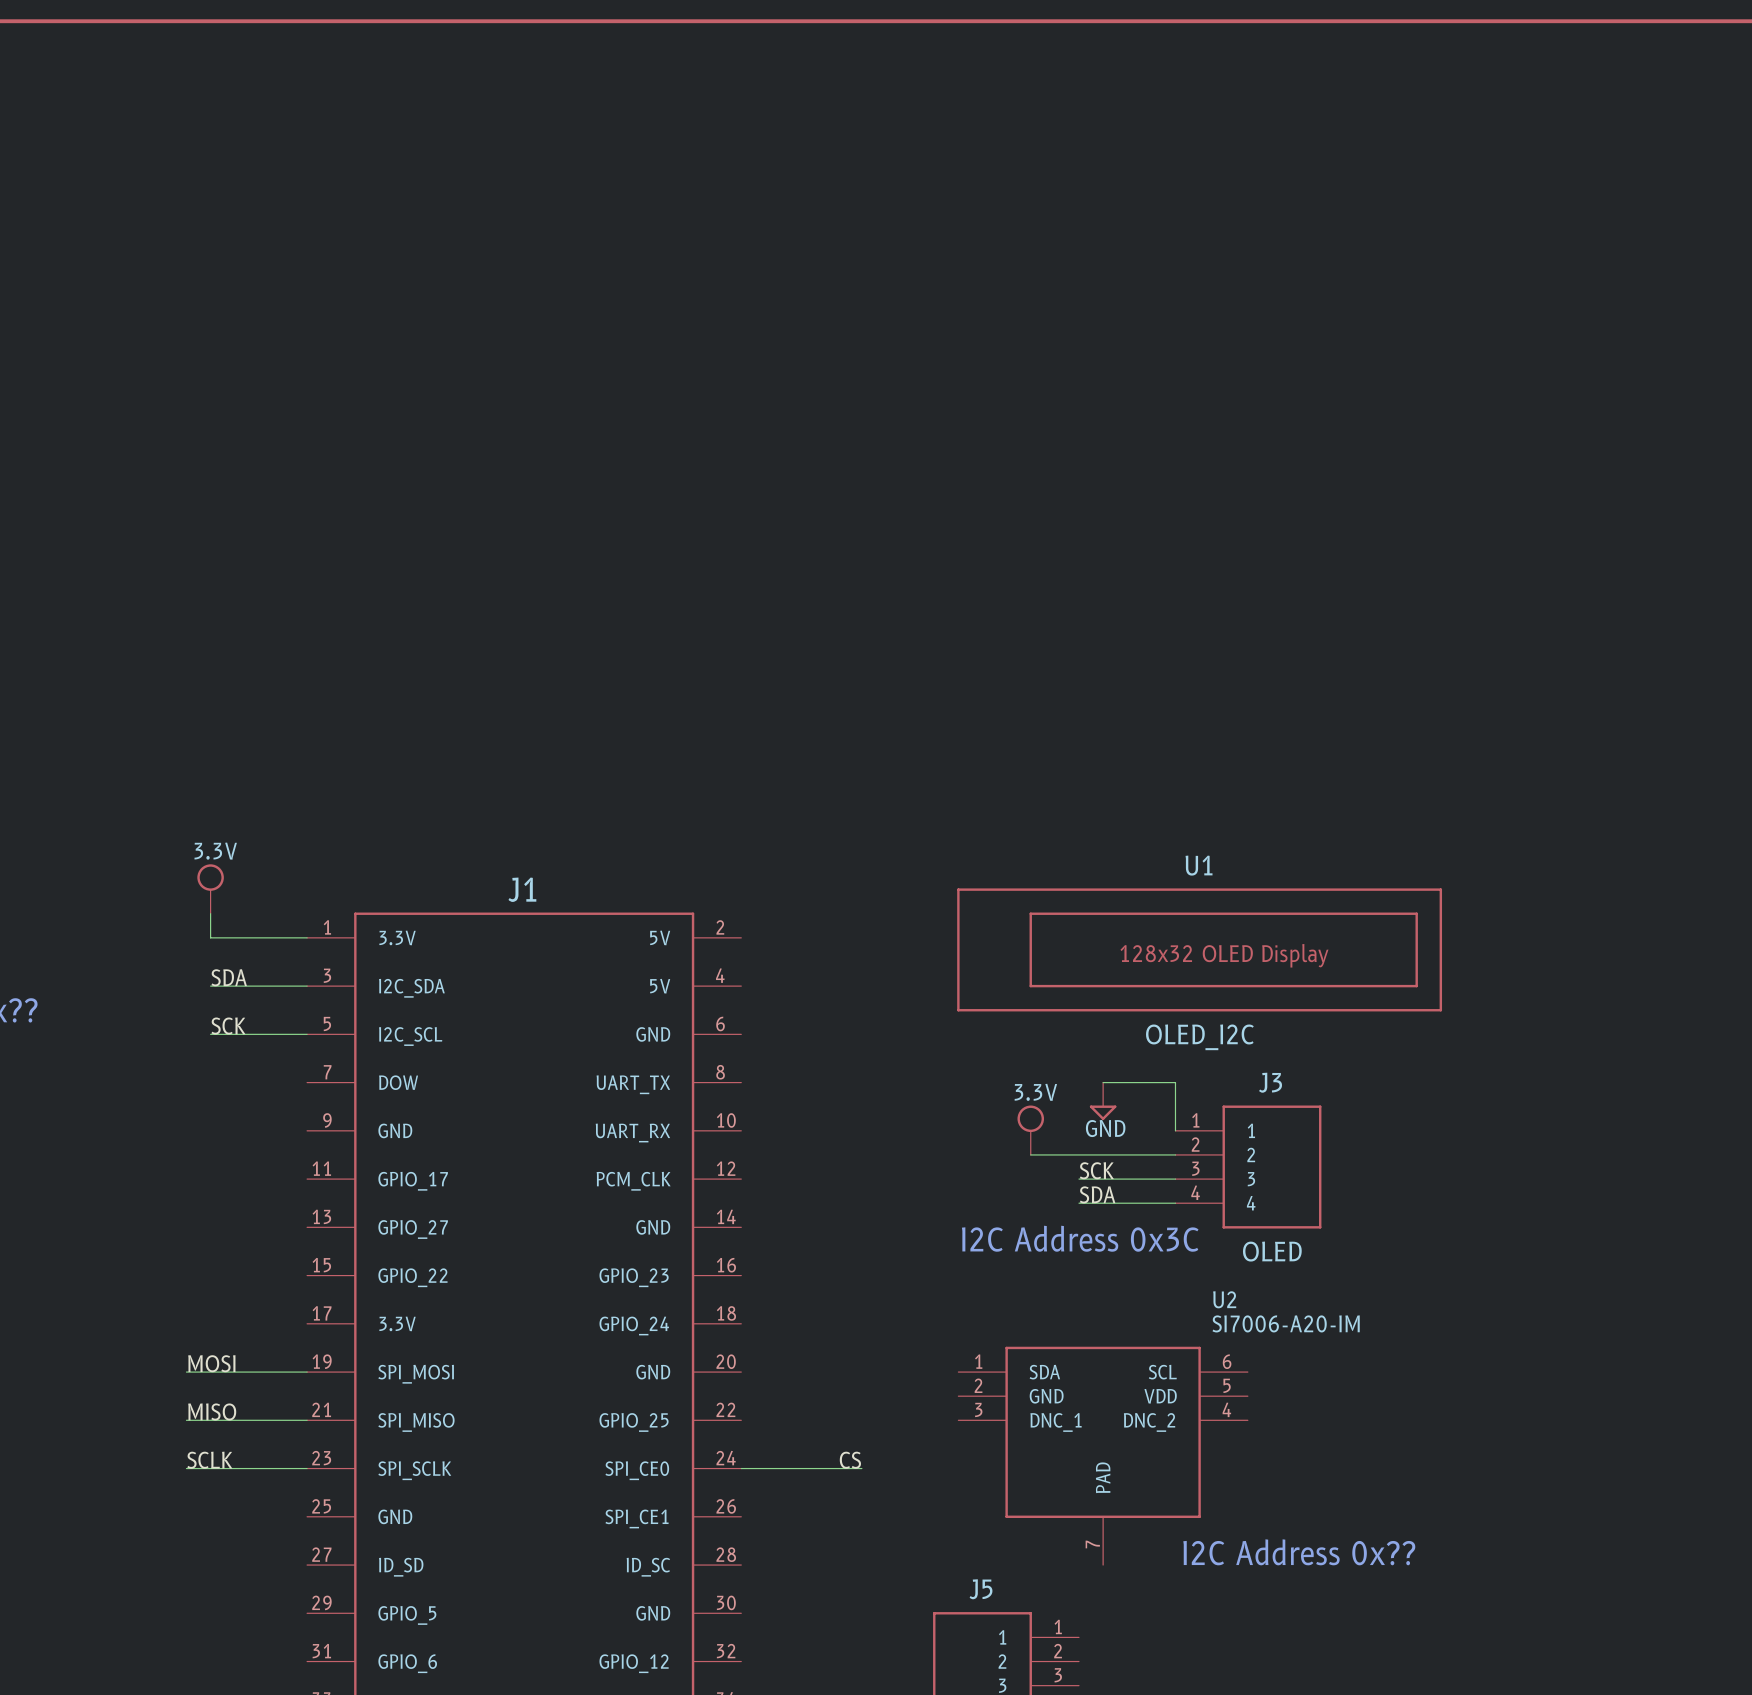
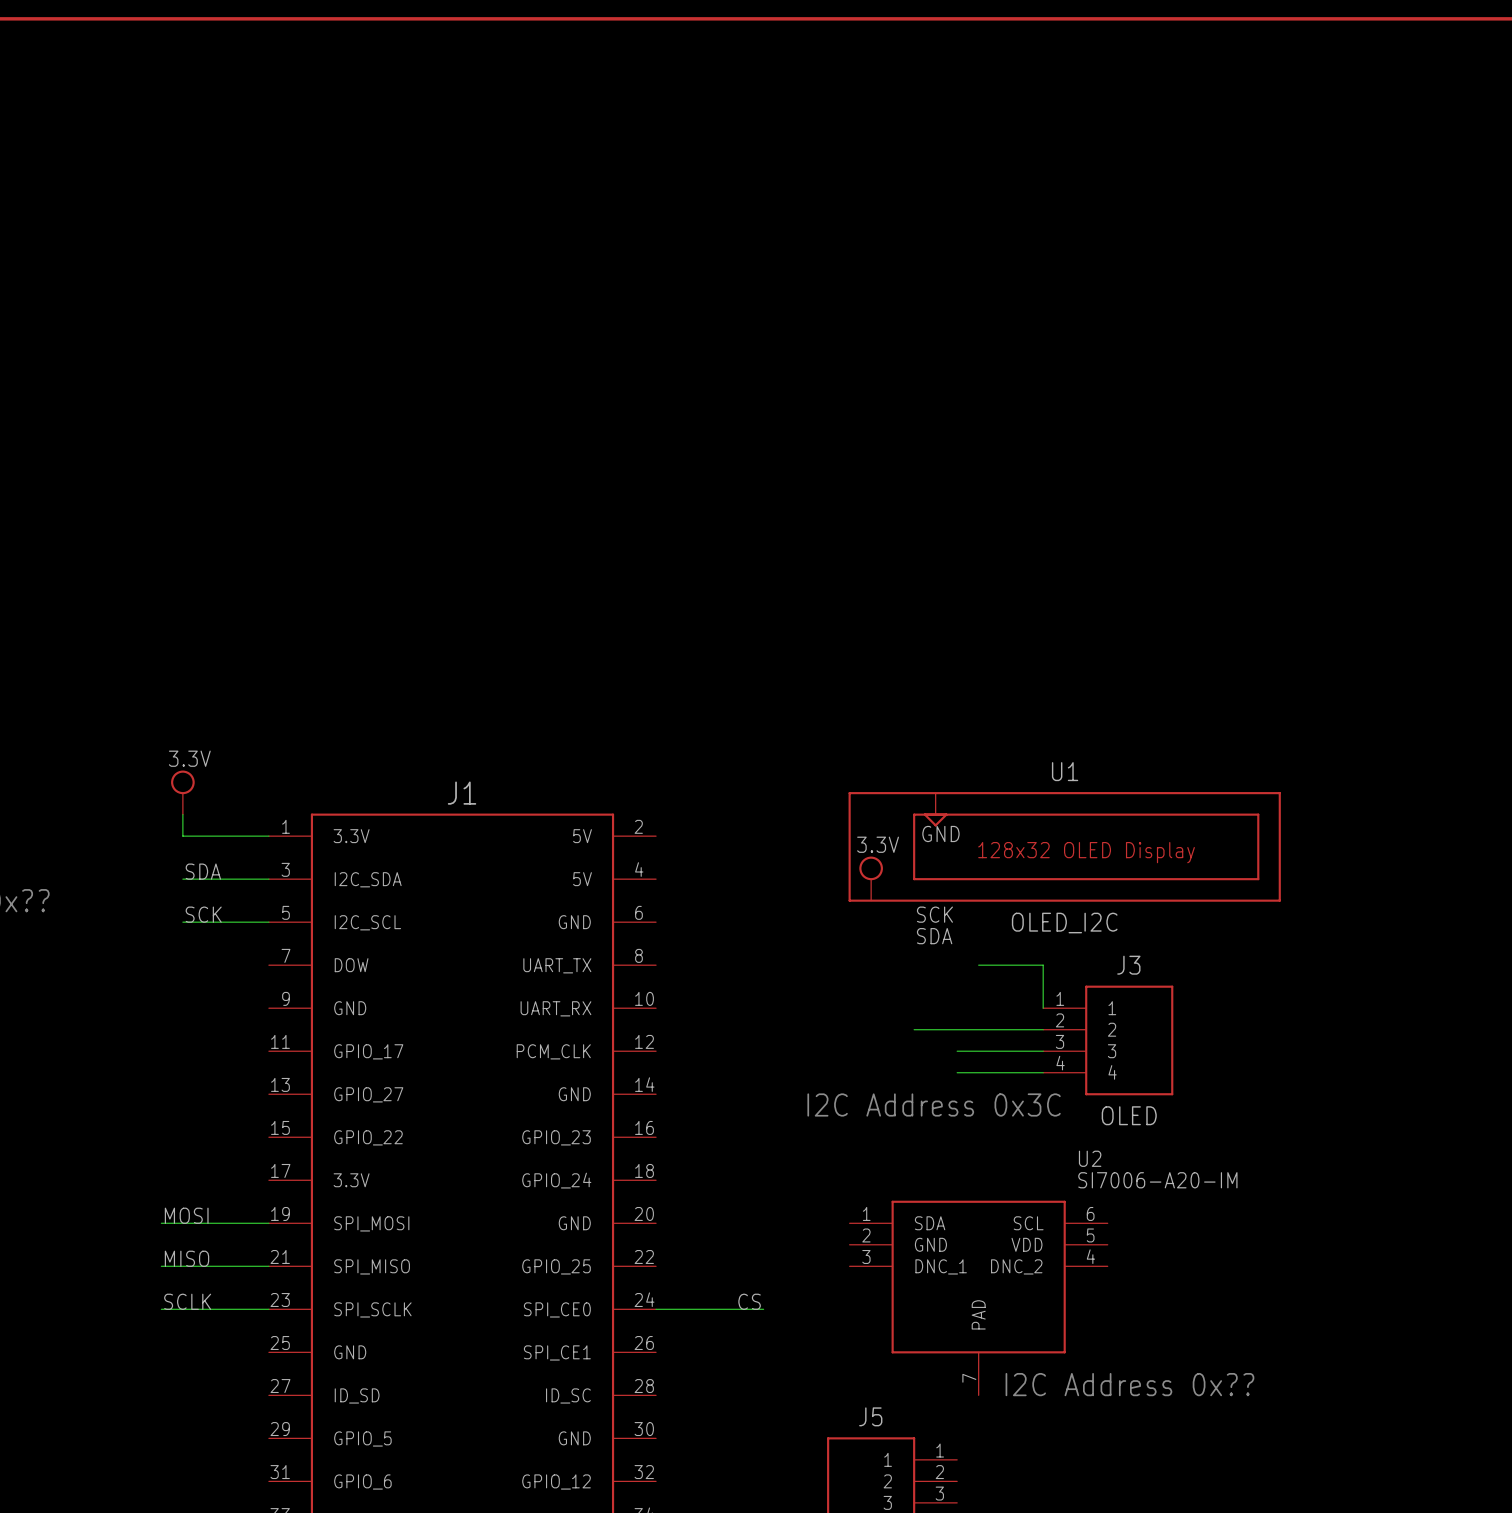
power symbol position: GND (1103, 1101) -> GND (935, 809)
power symbol position: 3.3V (1030, 1130) -> 3.3V (871, 878)
label position: SCK (1096, 1170) -> SCK (934, 914)
label position: SDA (1097, 1194) -> SDA (934, 936)

